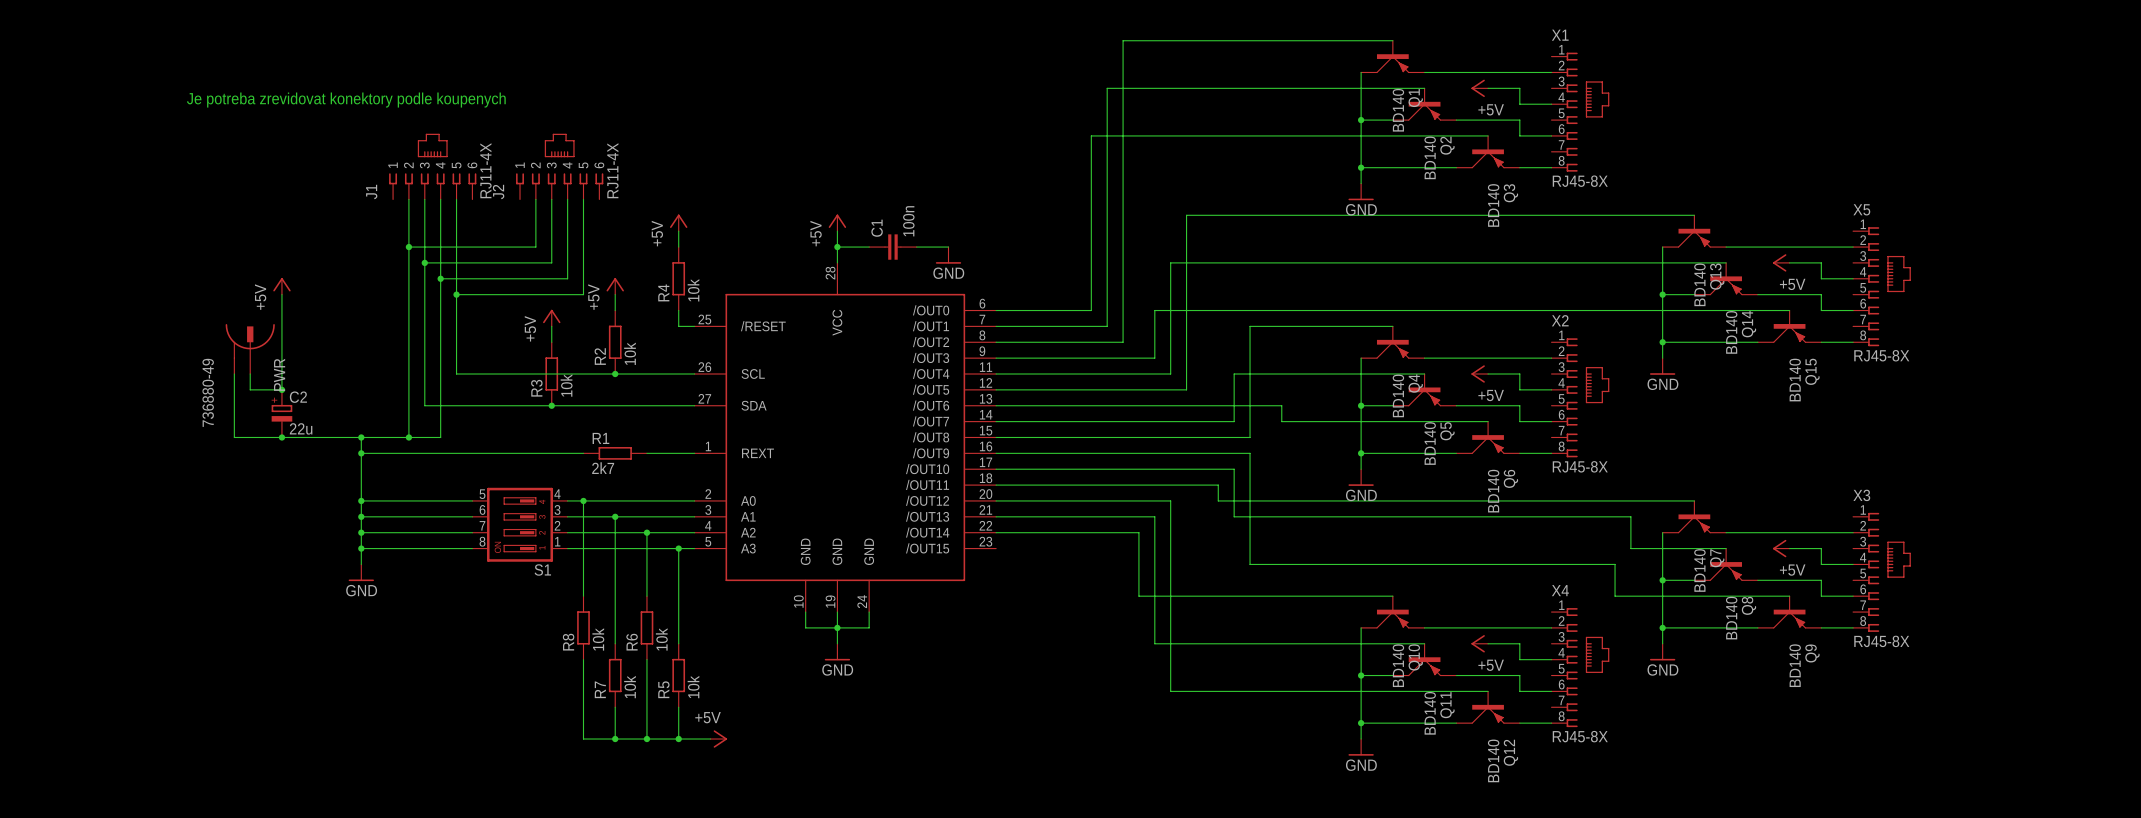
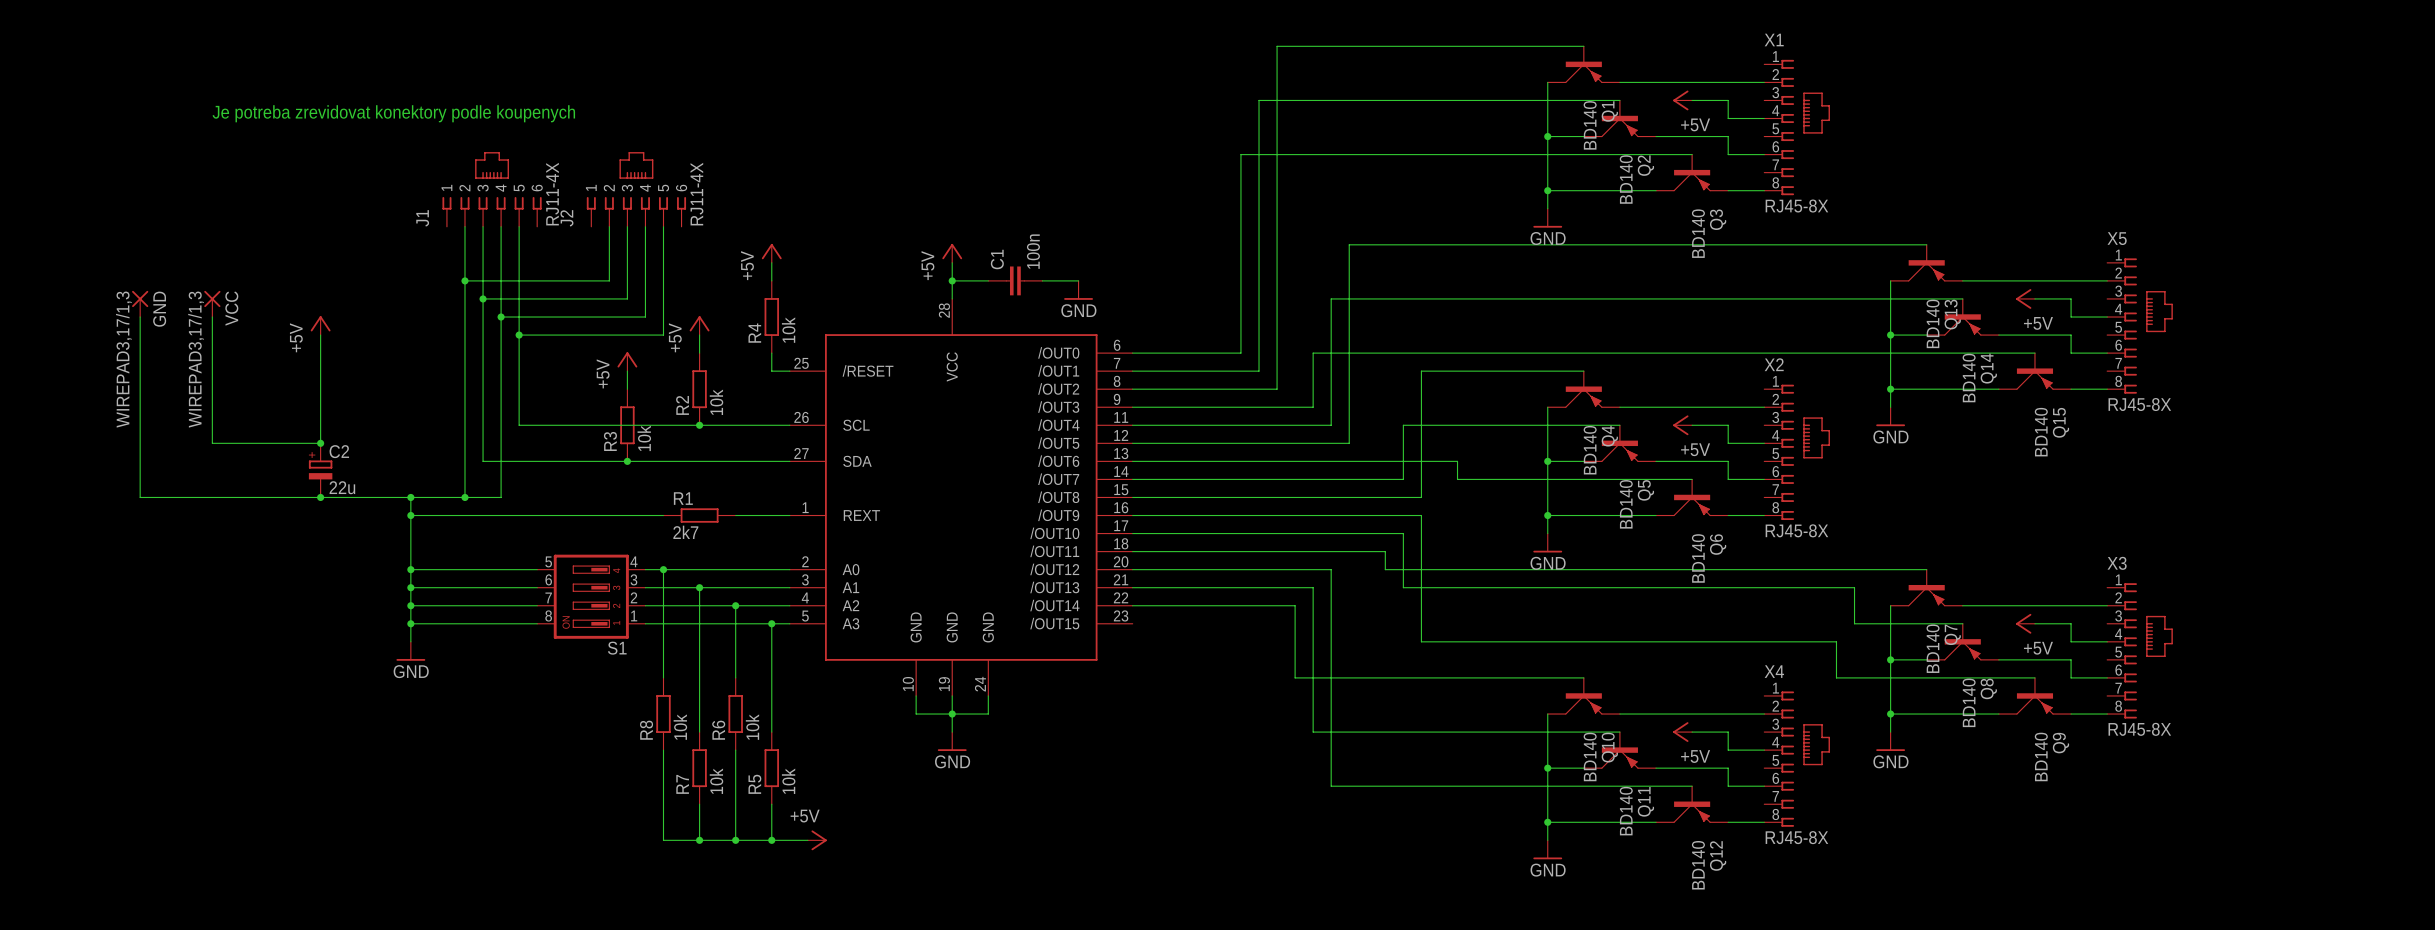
GND: none -> WIREPAD3,17/1,3 (140, 303)
VCC: none -> WIREPAD3,17/1,3 (212, 303)
PWR: 736880-49 (250, 349) -> none
wire: (234, 374) (234, 437) -> (140, 317) (140, 497) (266, 497)
wire: (250, 374) (250, 389) -> (212, 317) (212, 443) (284, 443)

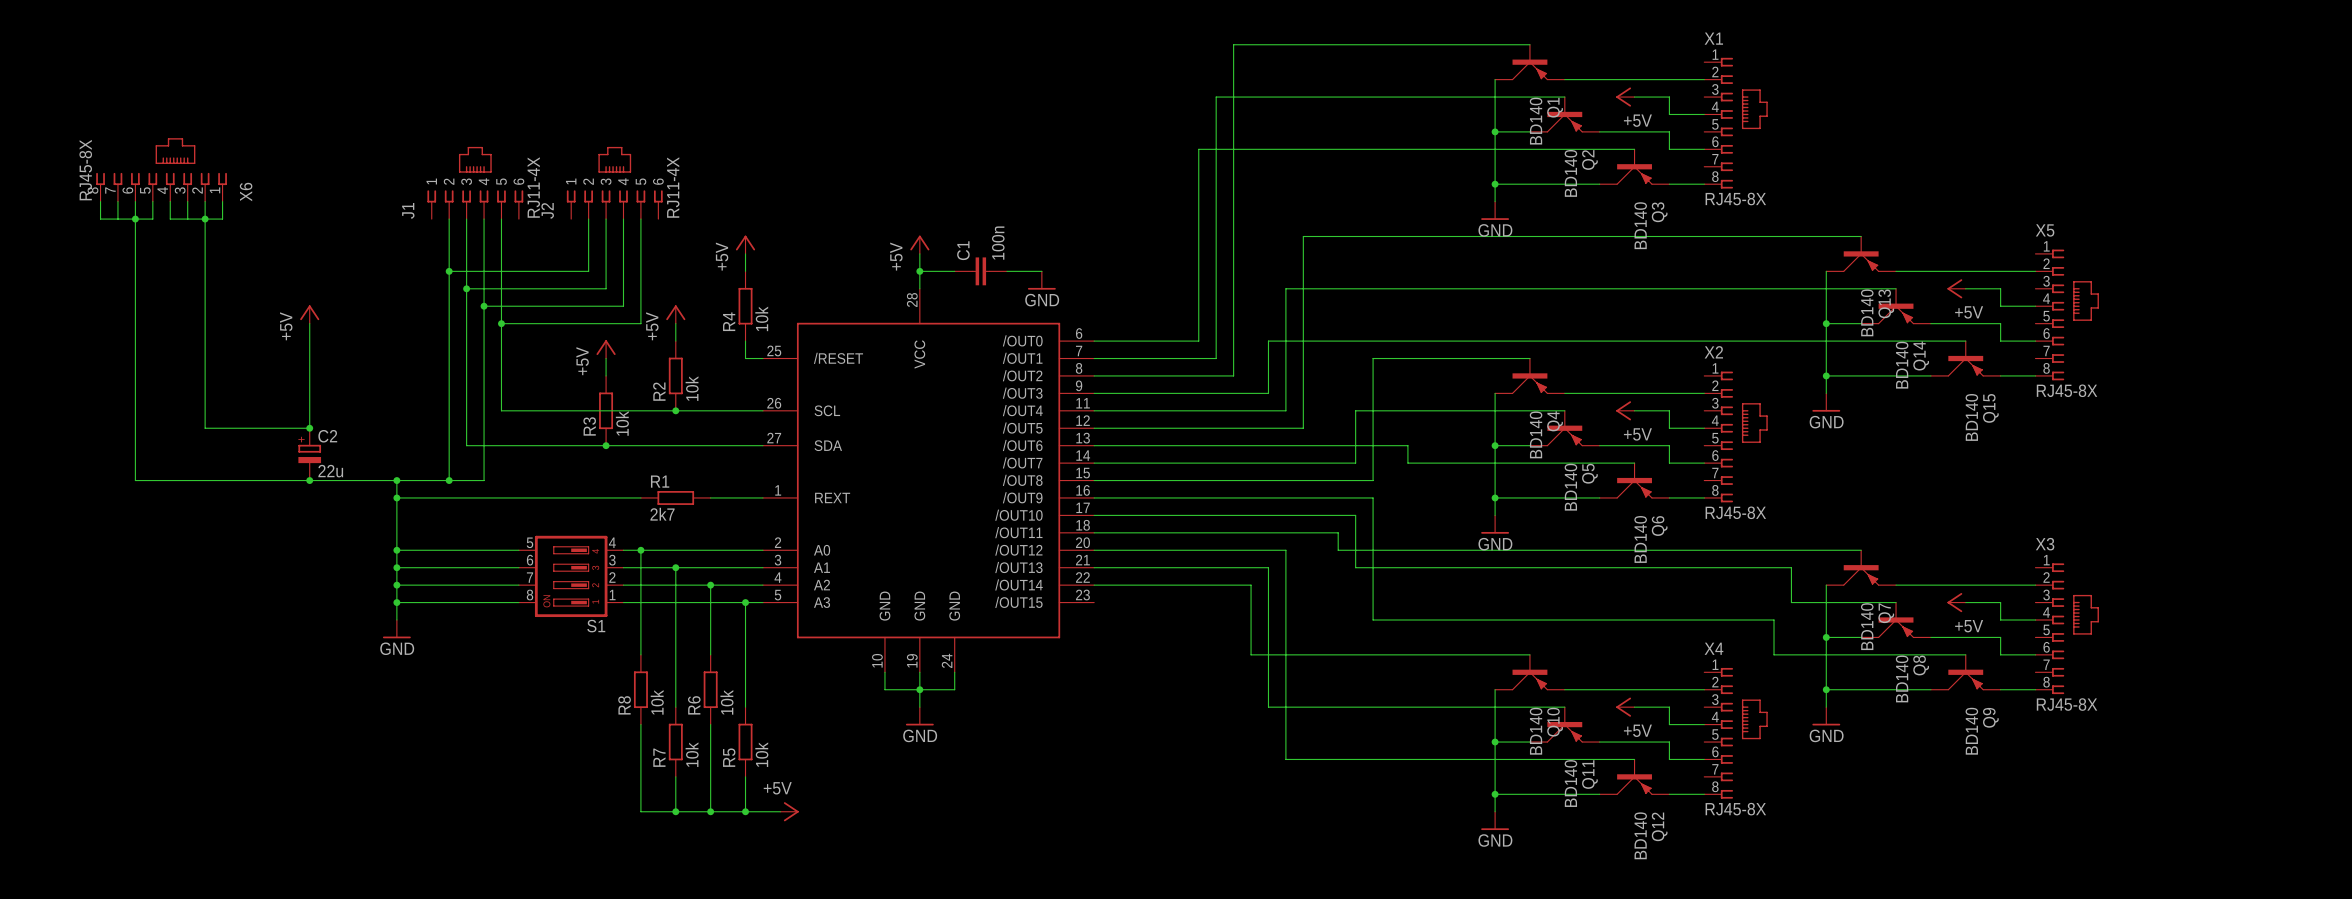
text: Je potreba zrevidovat konektory podle koupenych (393, 113) -> none
X6: none -> RJ45-8X (161, 169)
wire: none -> (100, 201) (100, 219) (152, 219) (152, 201)
wire: none -> (117, 201) (117, 219)
wire: none -> (135, 201) (135, 306)
wire: none -> (170, 201) (170, 219) (222, 219) (222, 201)
wire: none -> (187, 201) (187, 219)
wire: none -> (205, 201) (205, 306)
junction: none -> (135, 219)
junction: none -> (205, 219)
GND: WIREPAD3,17/1,3 (140, 303) -> none
VCC: WIREPAD3,17/1,3 (212, 303) -> none

